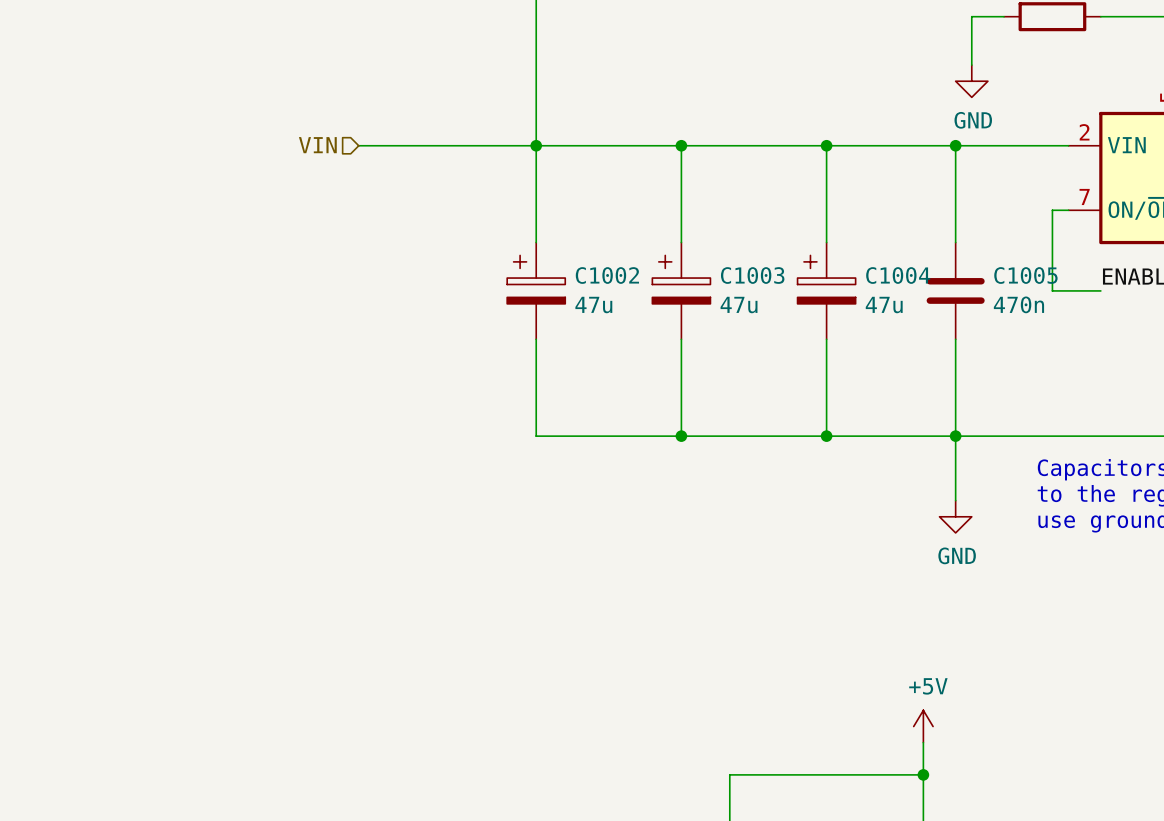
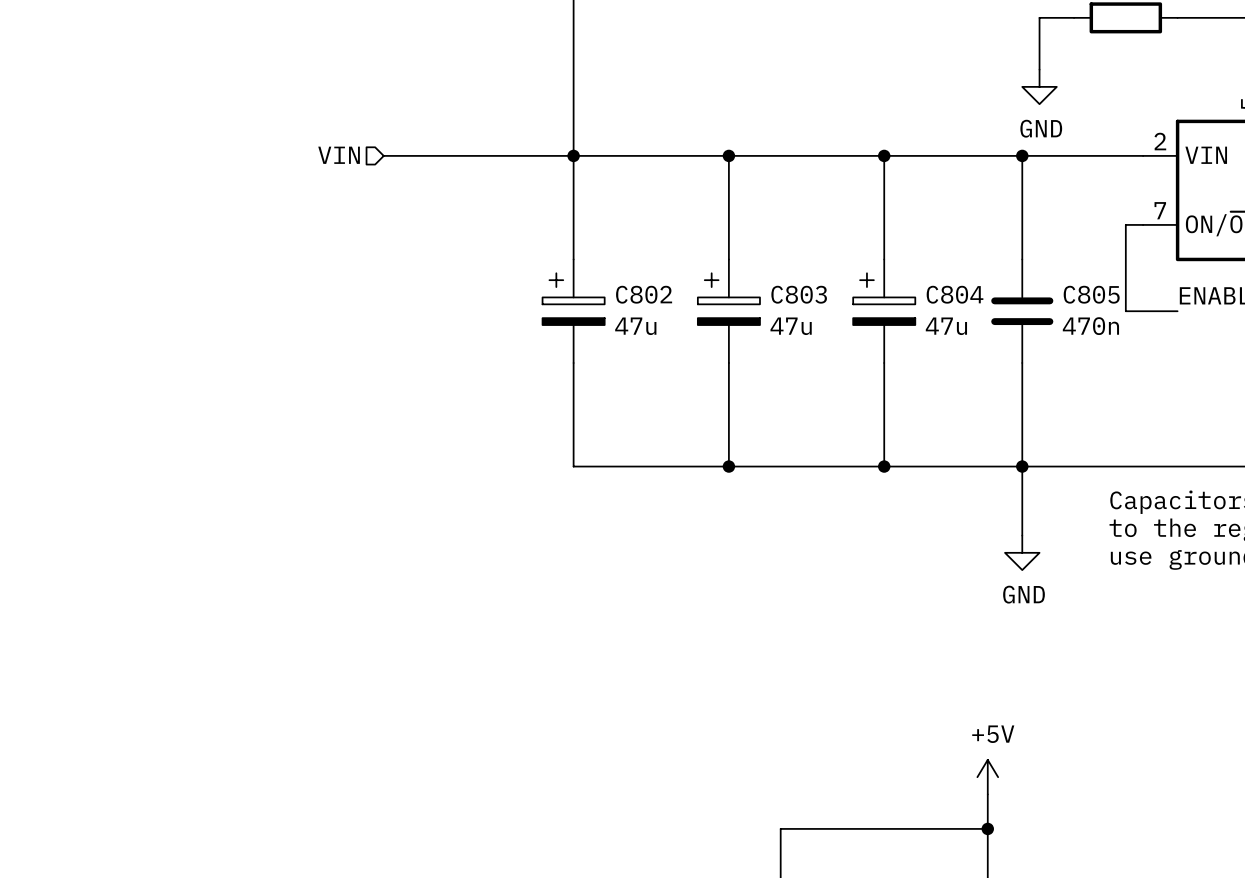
C1002 name: C1002 (607, 275) -> C802 (644, 294)
C1003 name: C1003 (752, 275) -> C803 (799, 294)
C1004 name: C1004 (898, 275) -> C804 (955, 294)
C1005 name: C1005 (1025, 275) -> C805 (1091, 294)

